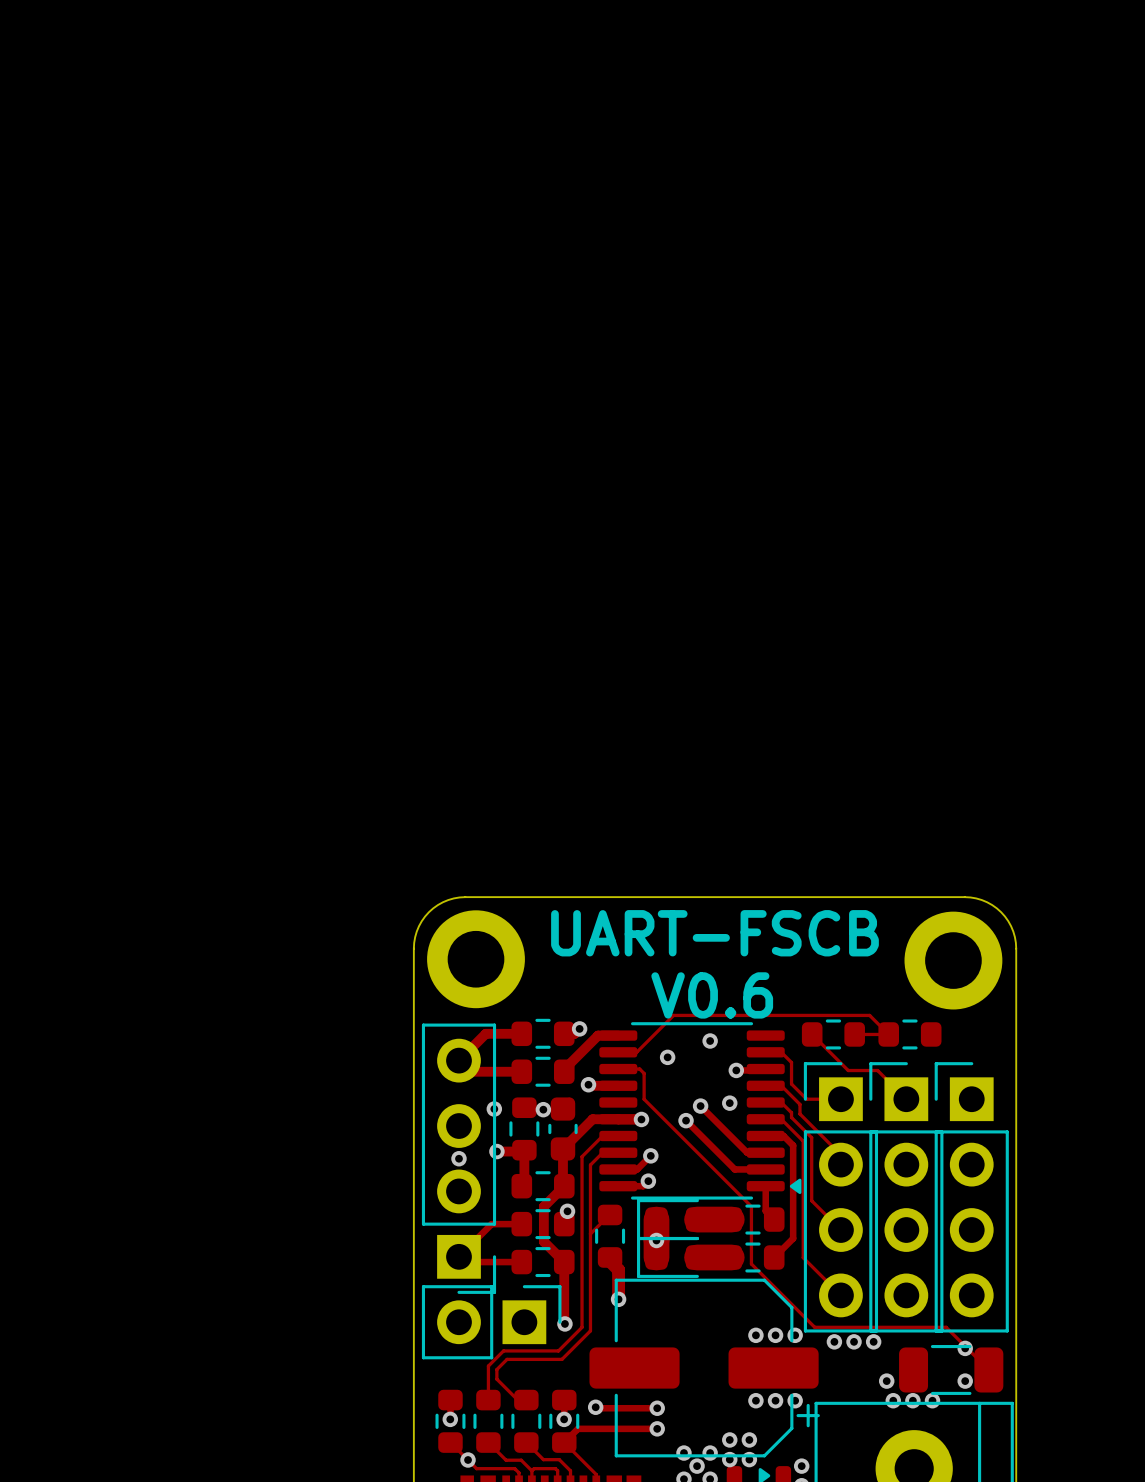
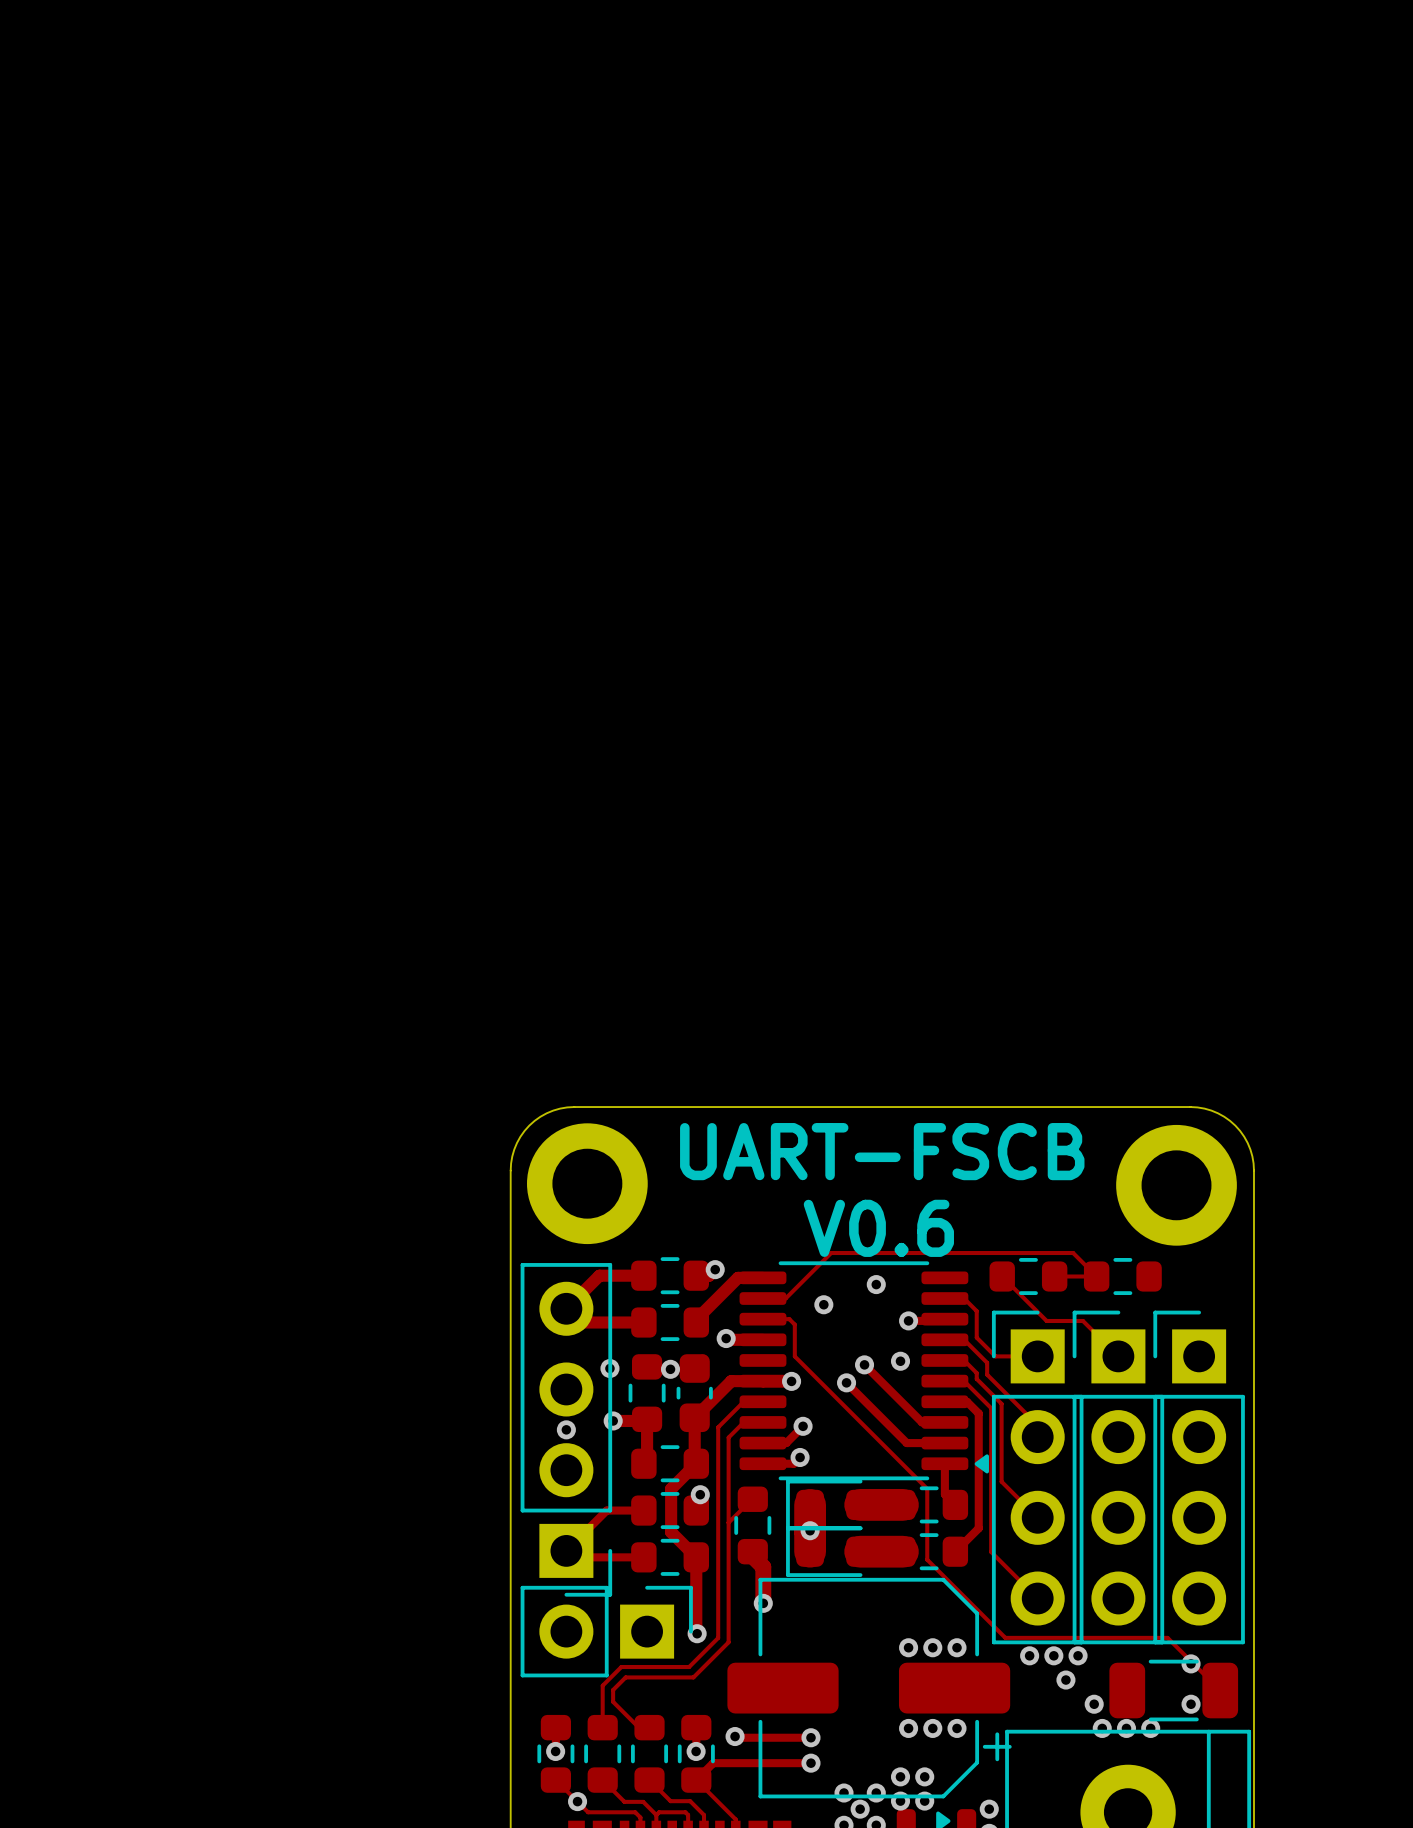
via: none -> (908, 1647)
via: (795, 1335) -> none
via: none -> (1065, 1680)
via: none -> (908, 1728)
via: (795, 1400) -> none

